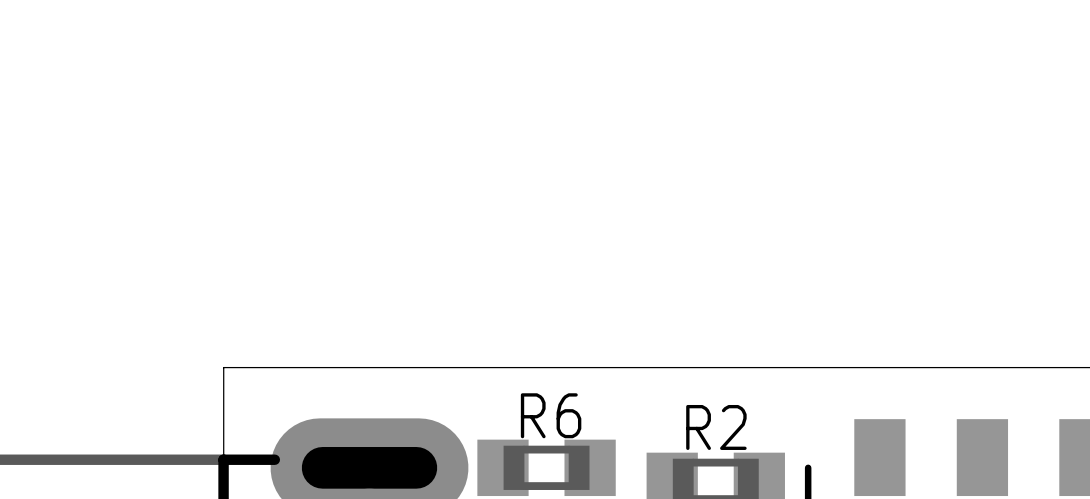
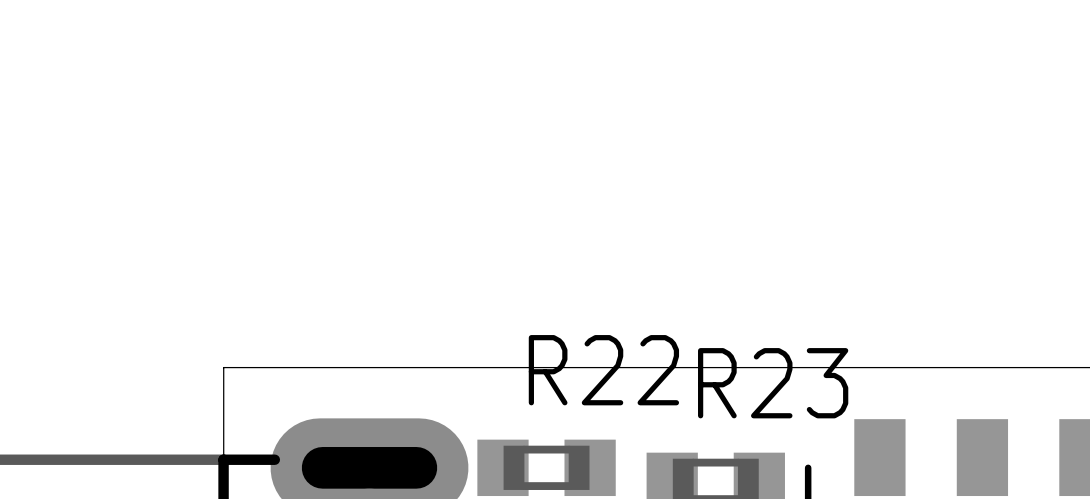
R6 name: R6 (551, 415) -> R22 (603, 370)
R2 name: R2 (716, 427) -> R23 (773, 383)

